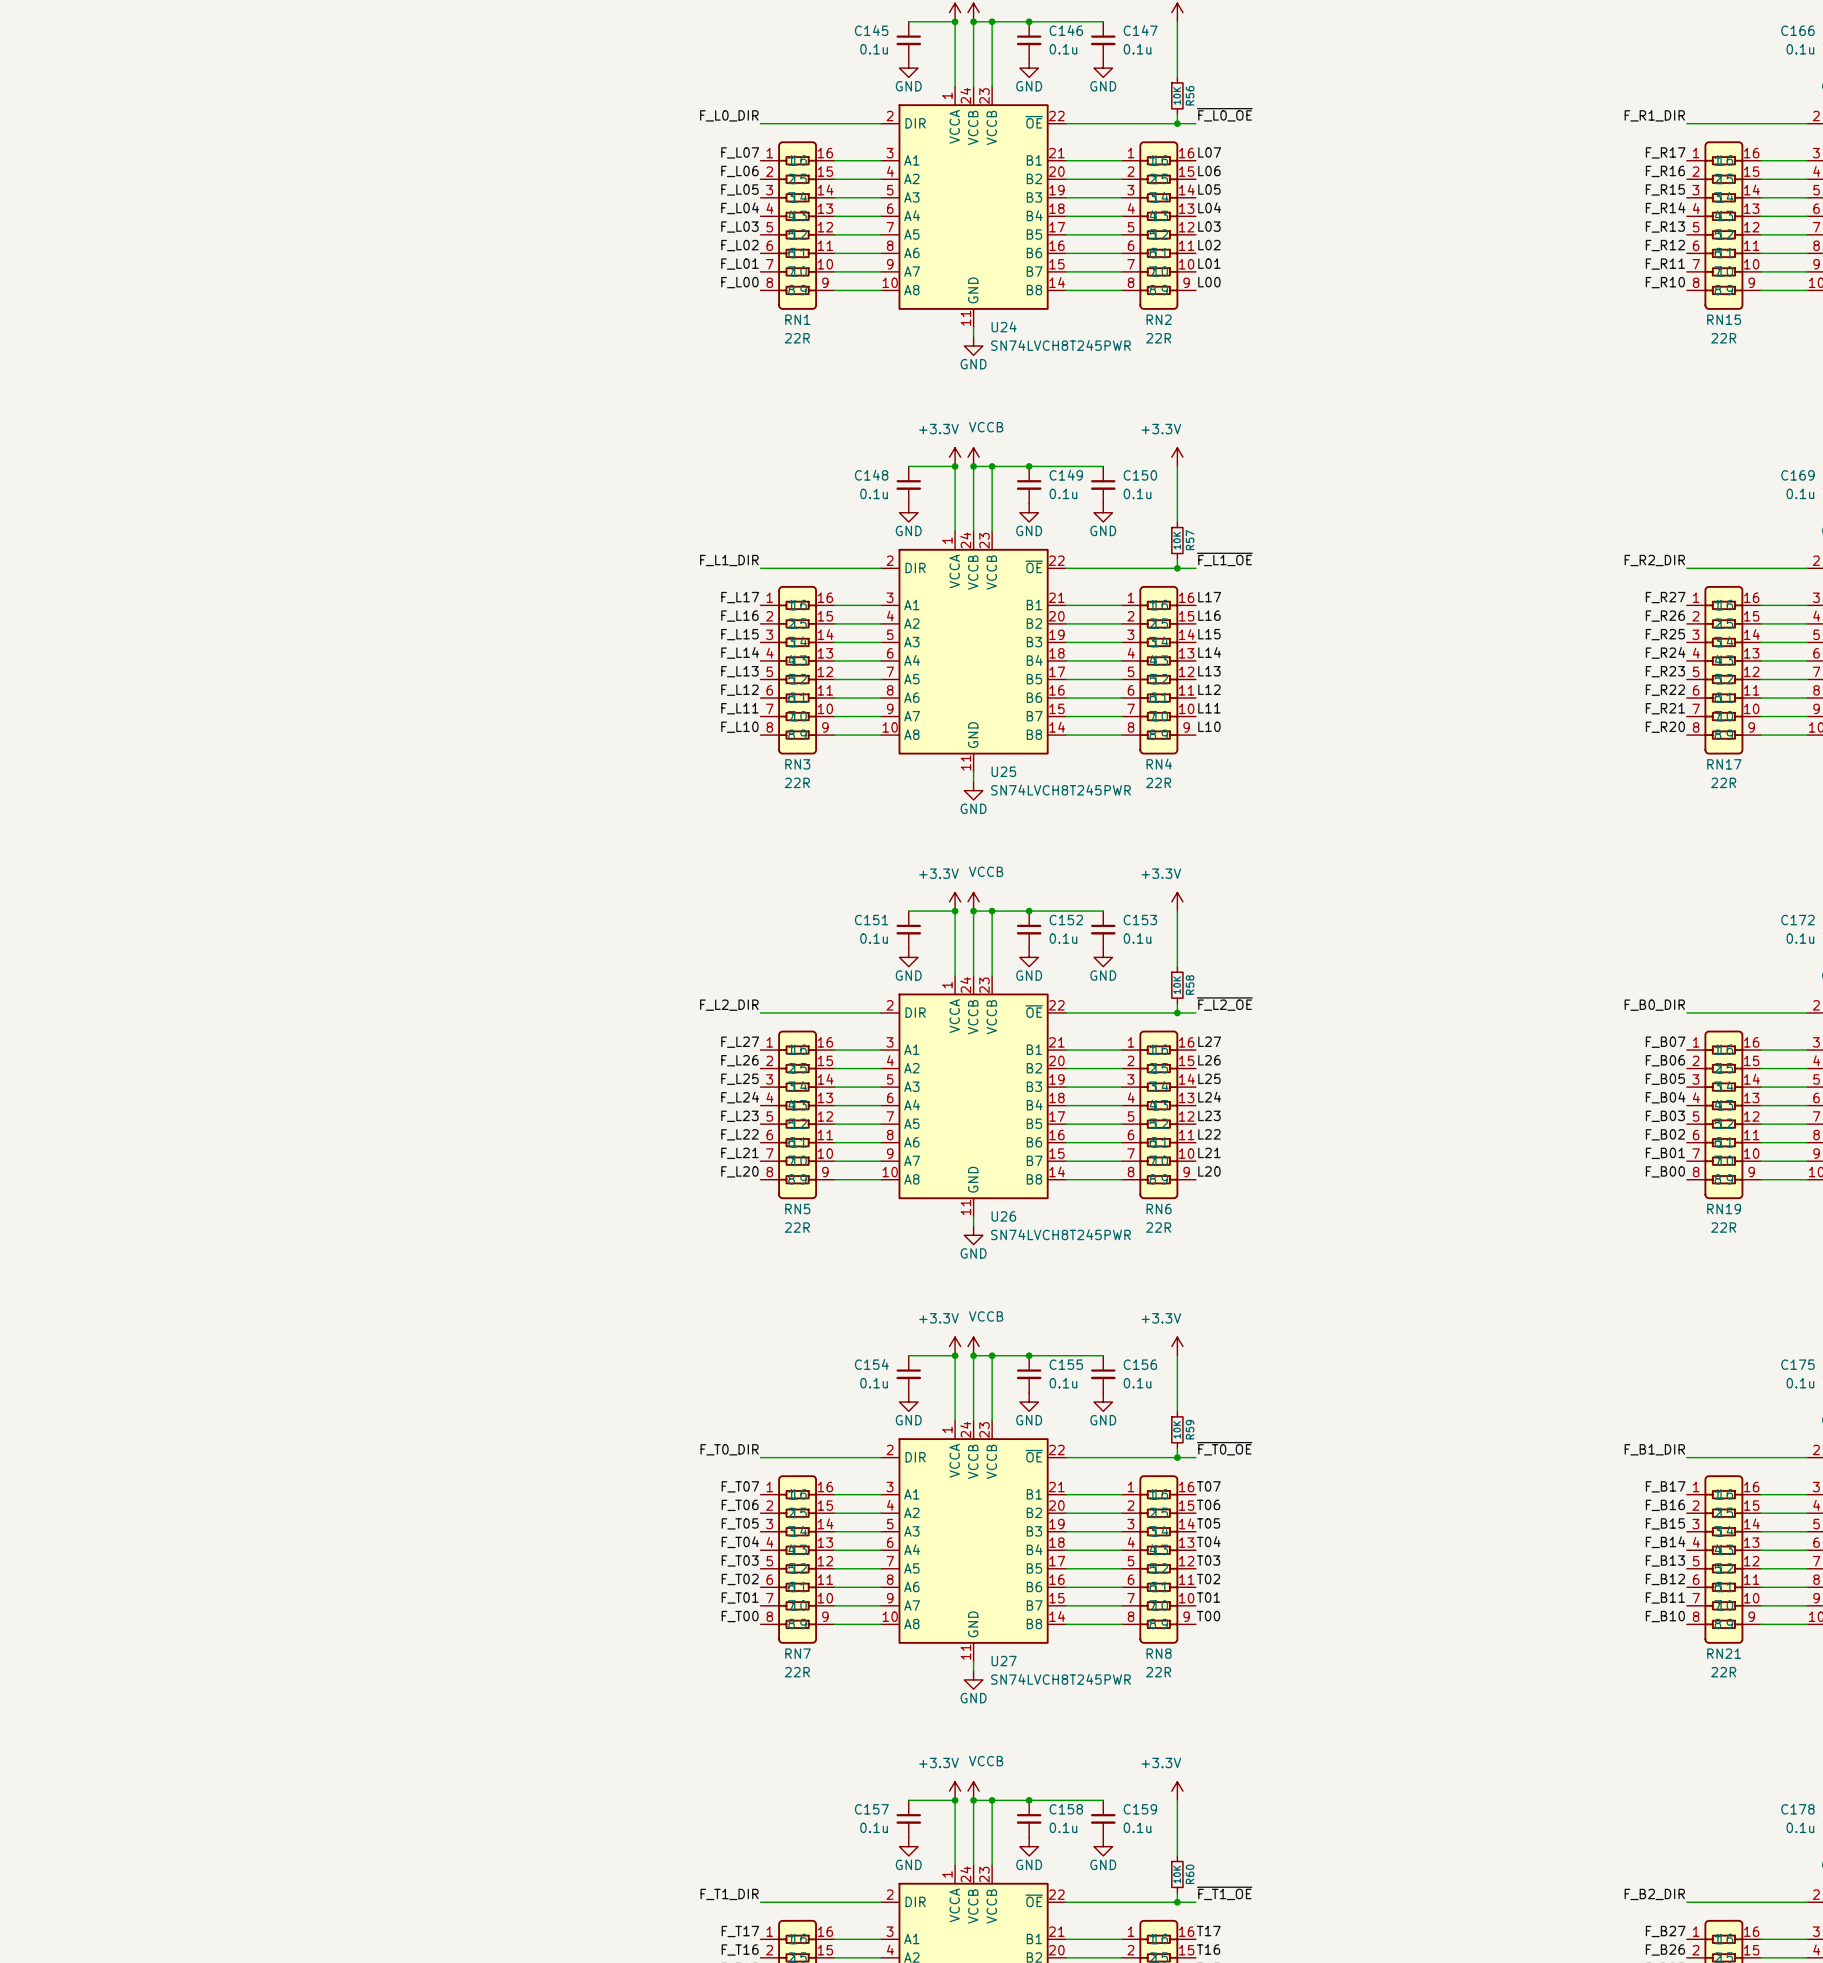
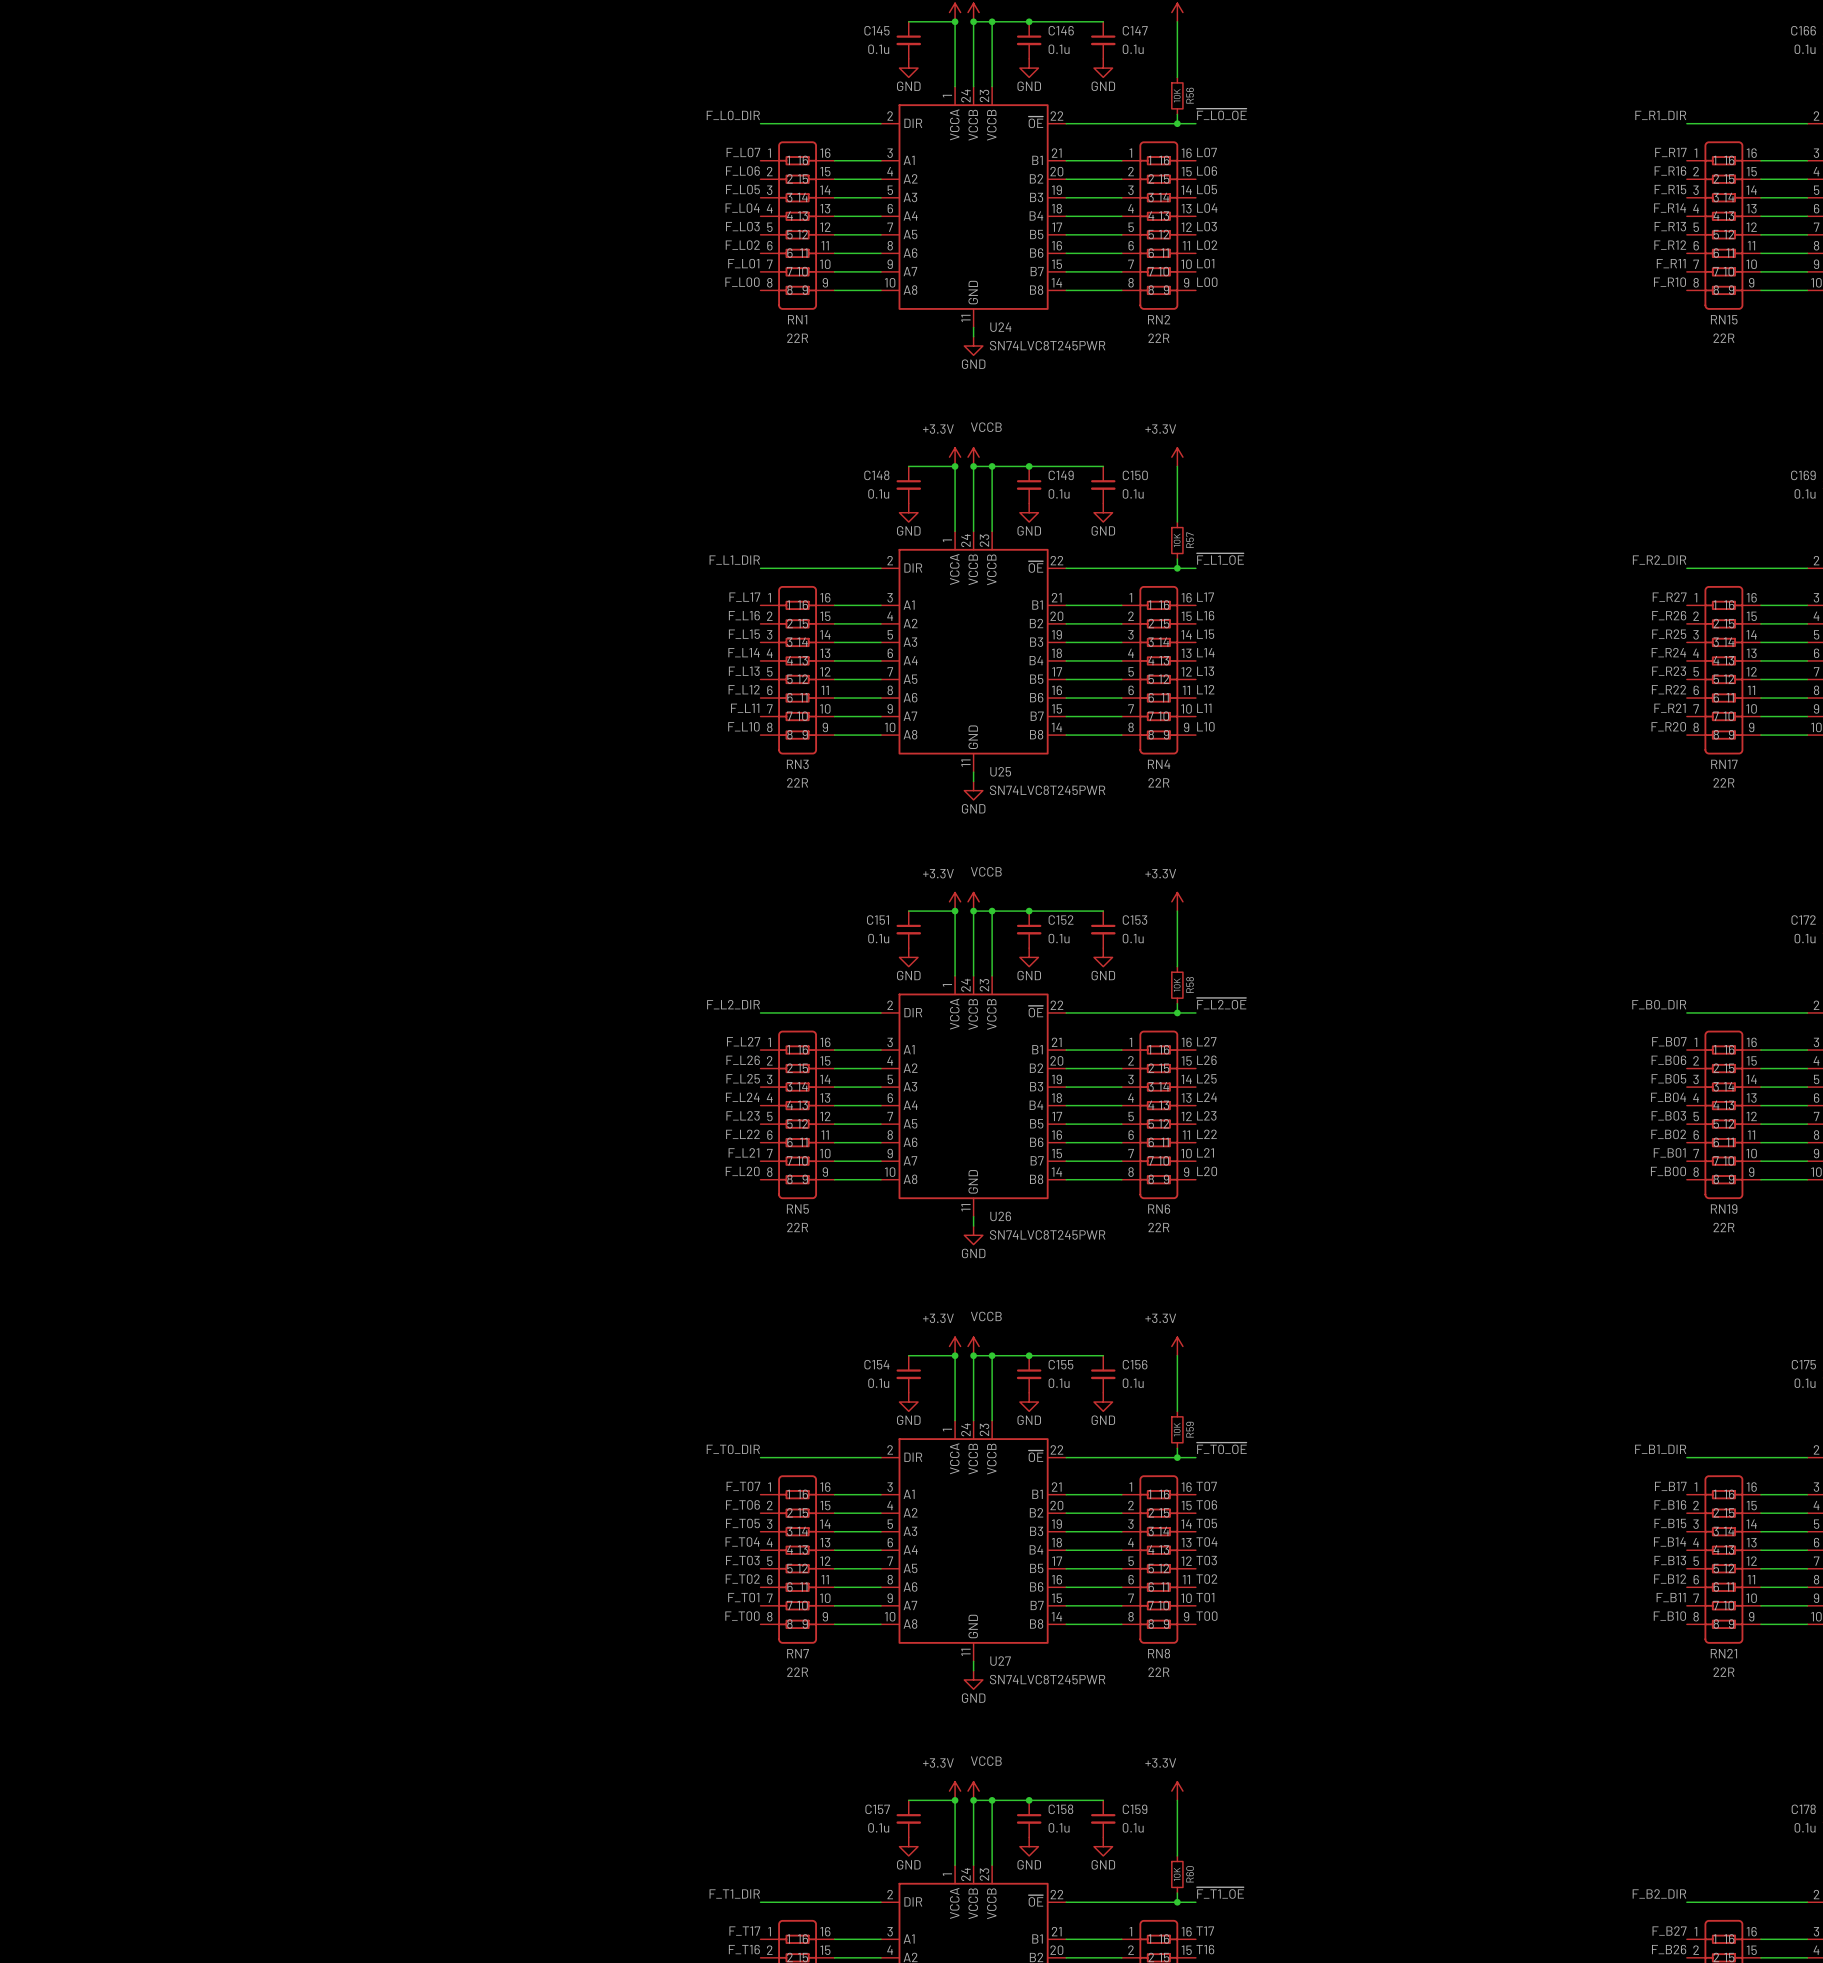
U24 value: SN74LVCH8T245PWR (1060, 345) -> SN74LVC8T245PWR (1047, 345)
U25 value: SN74LVCH8T245PWR (1060, 790) -> SN74LVC8T245PWR (1047, 790)
U26 value: SN74LVCH8T245PWR (1060, 1234) -> SN74LVC8T245PWR (1047, 1234)
U27 value: SN74LVCH8T245PWR (1060, 1679) -> SN74LVC8T245PWR (1047, 1679)

